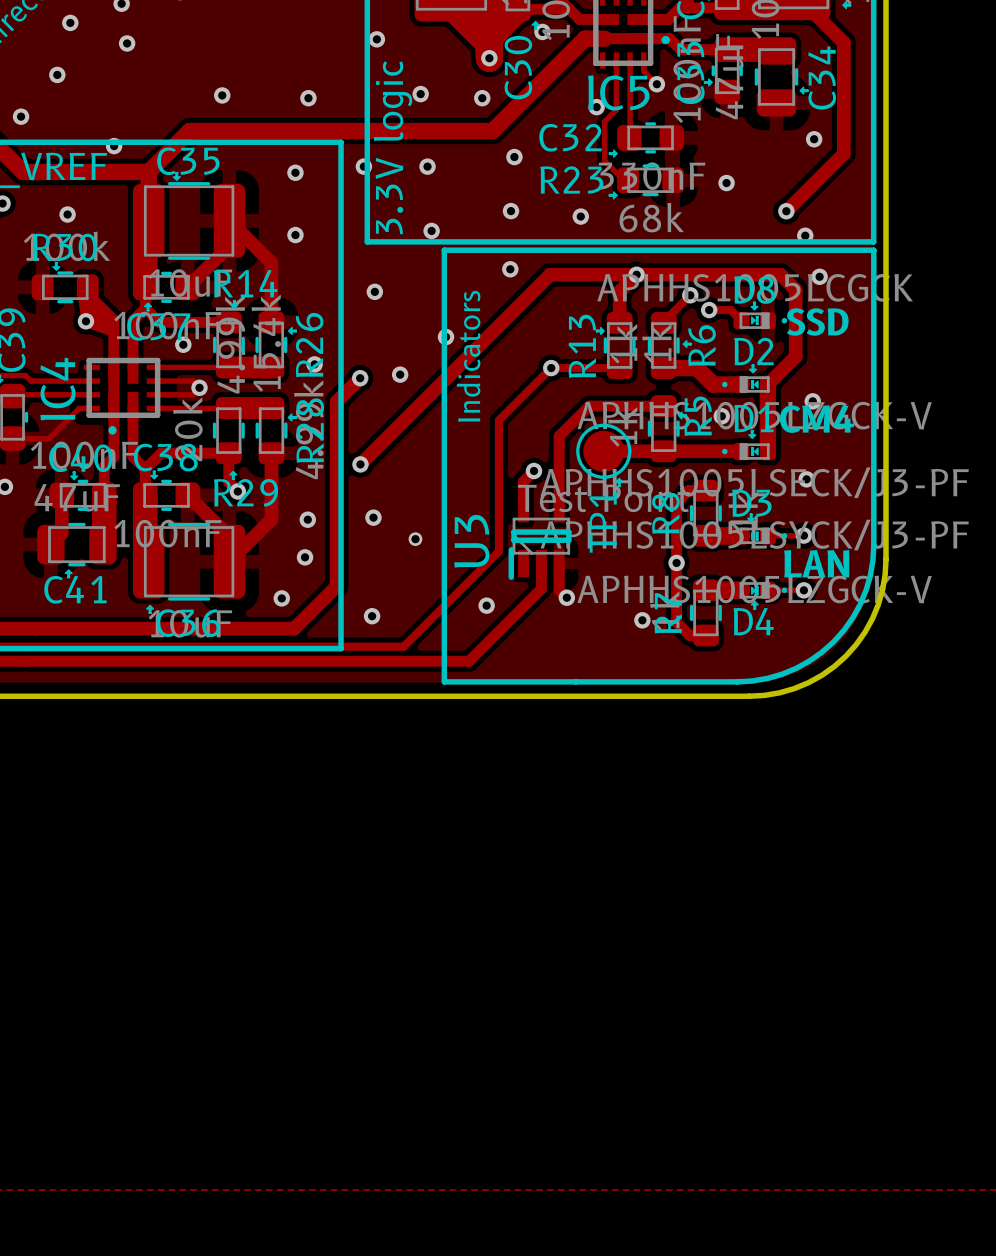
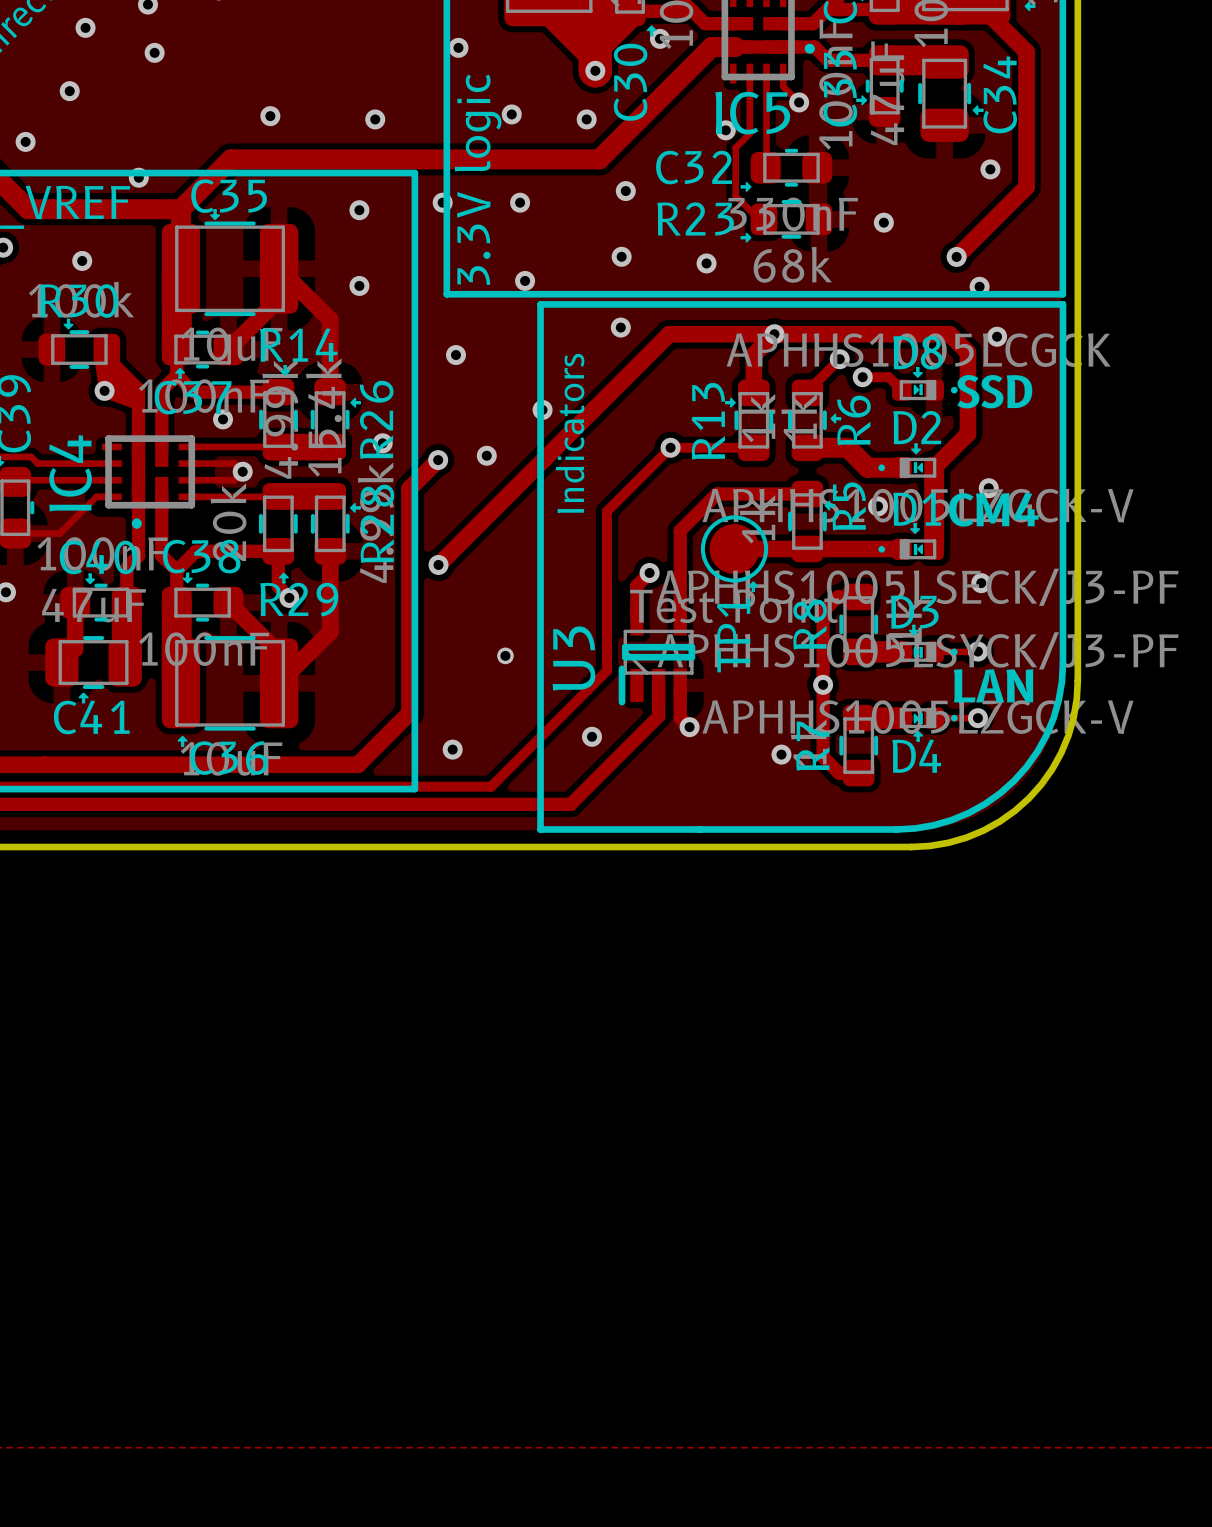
via: (373, 517) -> none
via: (307, 519) -> none
via: (305, 557) -> none
via: (281, 598) -> none

